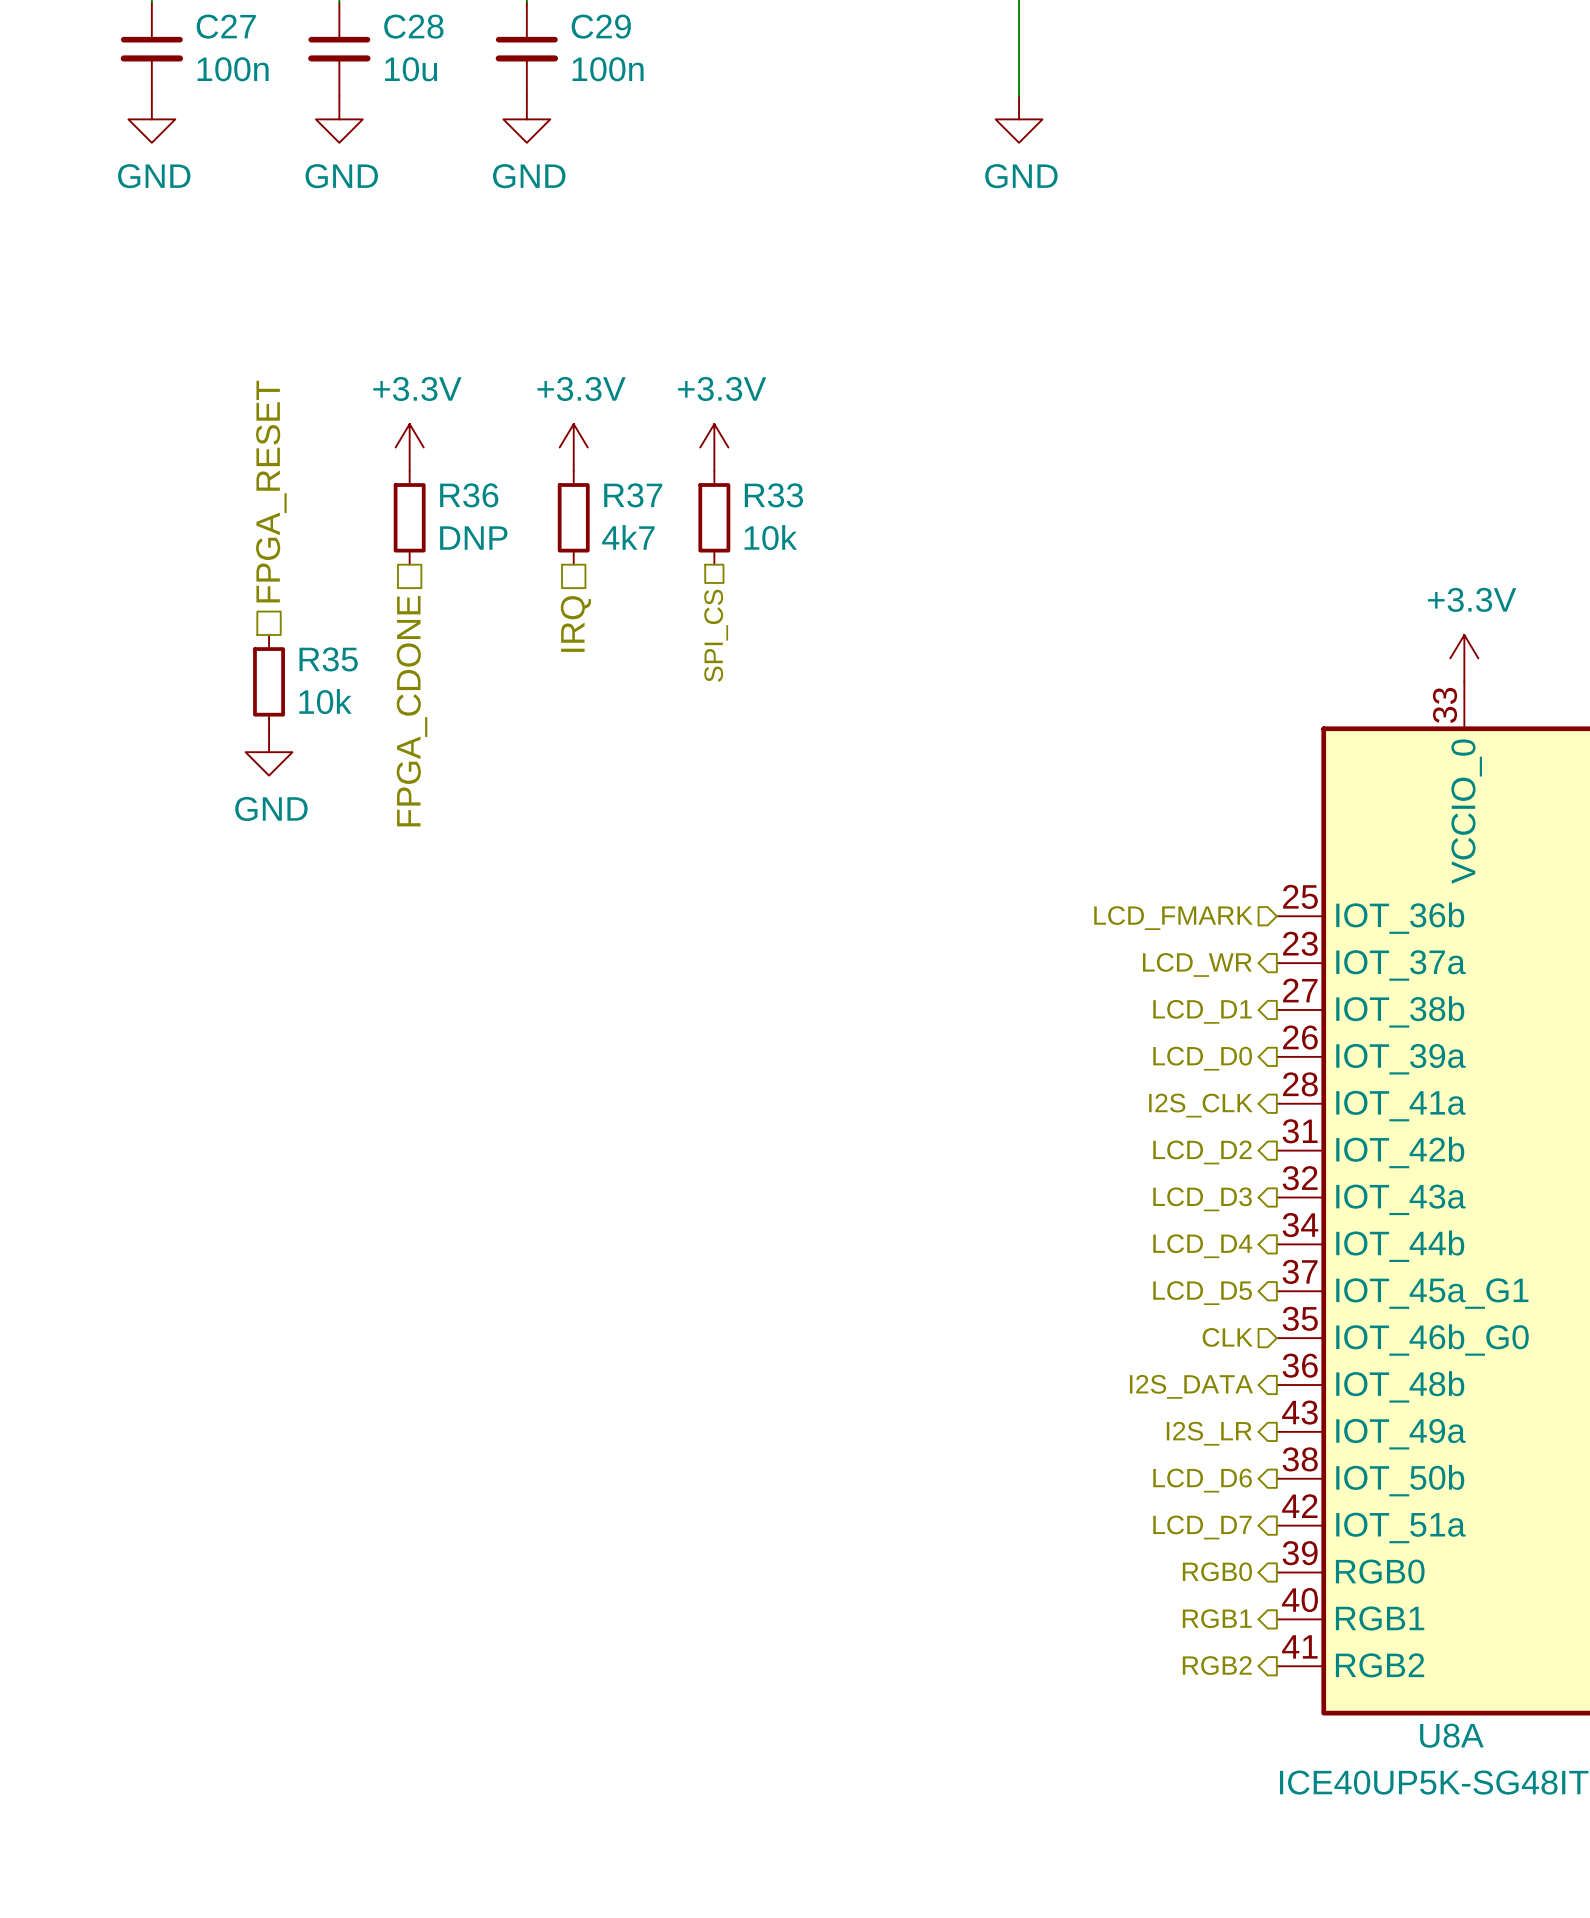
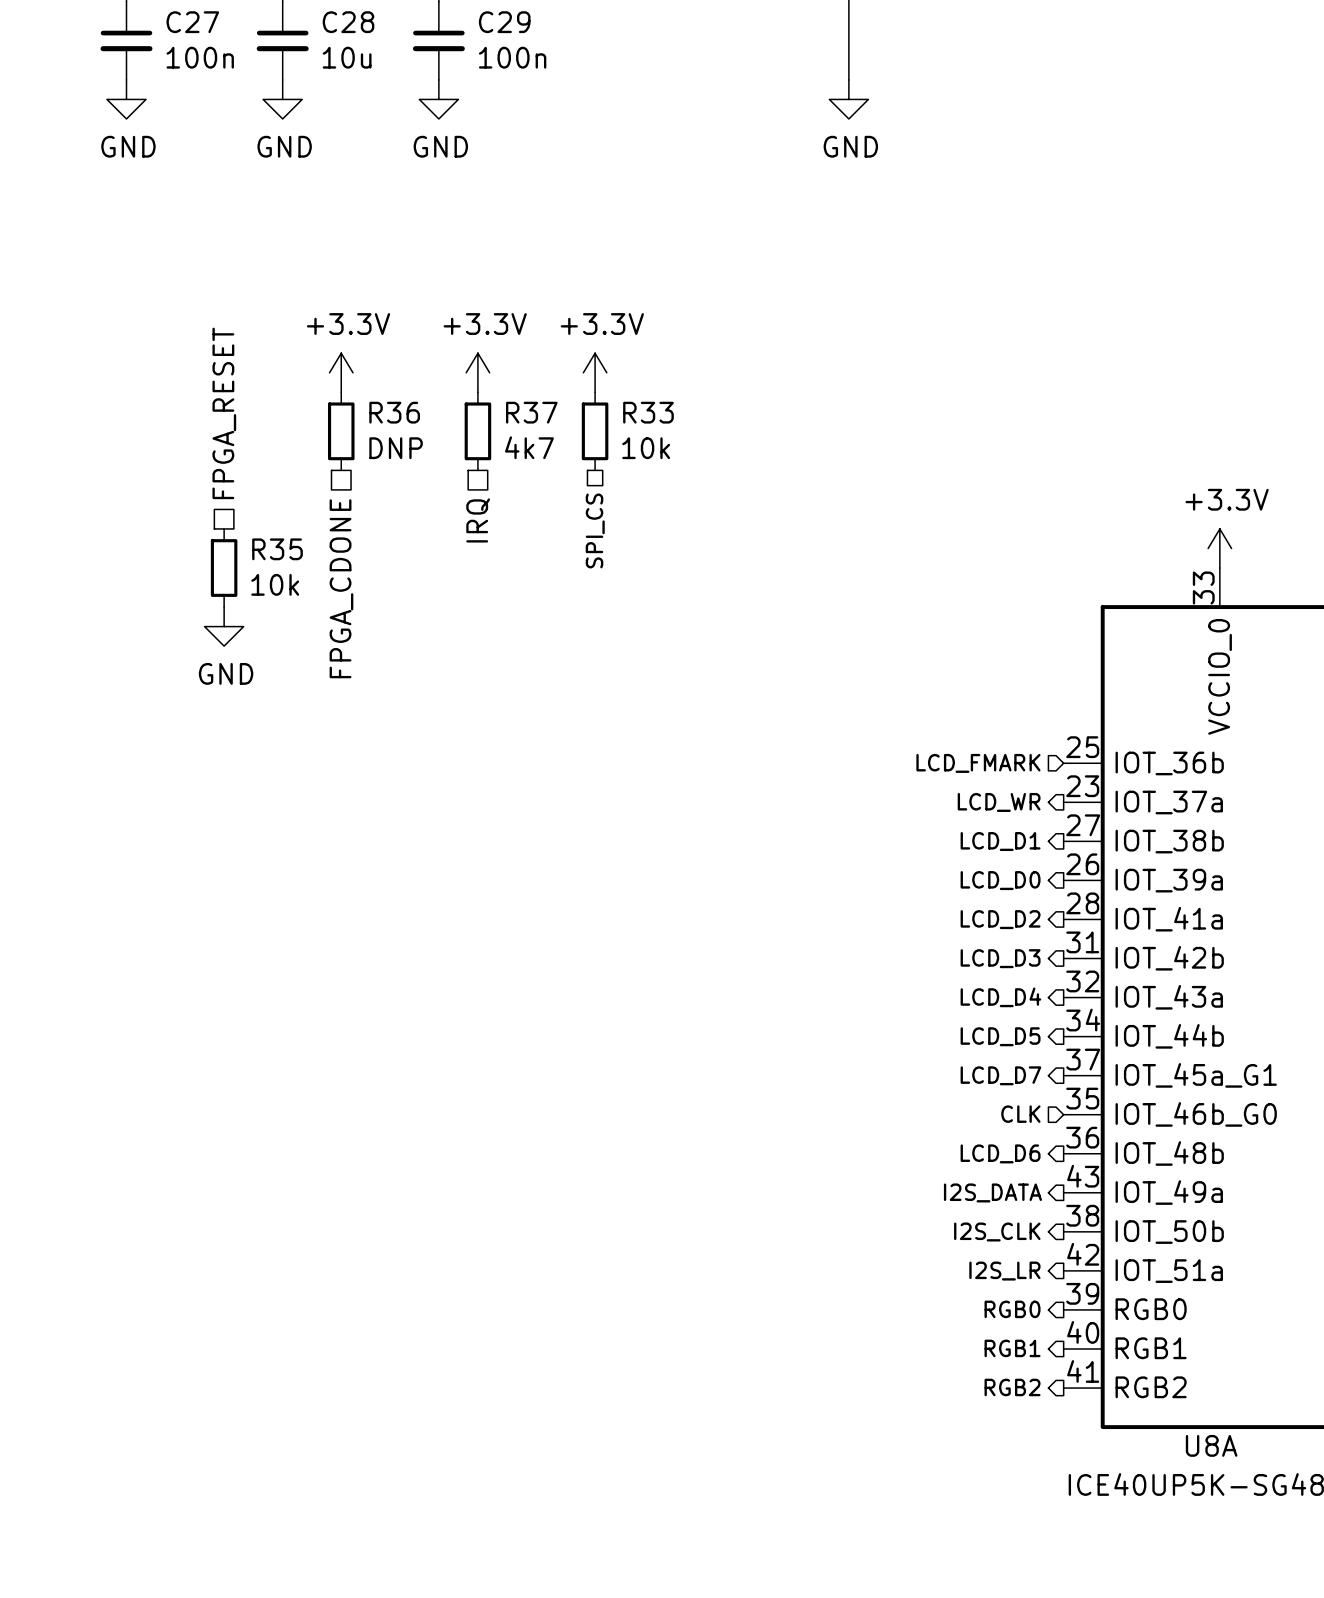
hierarchical label: I2S_CLK (1200, 1105) -> LCD_D2 (1000, 919)
hierarchical label: LCD_D2 (1202, 1152) -> LCD_D3 (1000, 958)
hierarchical label: LCD_D3 (1202, 1199) -> LCD_D4 (1000, 997)
hierarchical label: LCD_D4 (1202, 1246) -> LCD_D5 (1000, 1036)
hierarchical label: LCD_D5 (1202, 1293) -> LCD_D7 (1000, 1075)
hierarchical label: I2S_DATA (1191, 1386) -> LCD_D6 (1000, 1153)
hierarchical label: I2S_LR (1209, 1433) -> I2S_DATA (992, 1192)
hierarchical label: LCD_D6 (1202, 1480) -> I2S_CLK (997, 1232)
hierarchical label: LCD_D7 (1202, 1527) -> I2S_LR (1004, 1271)

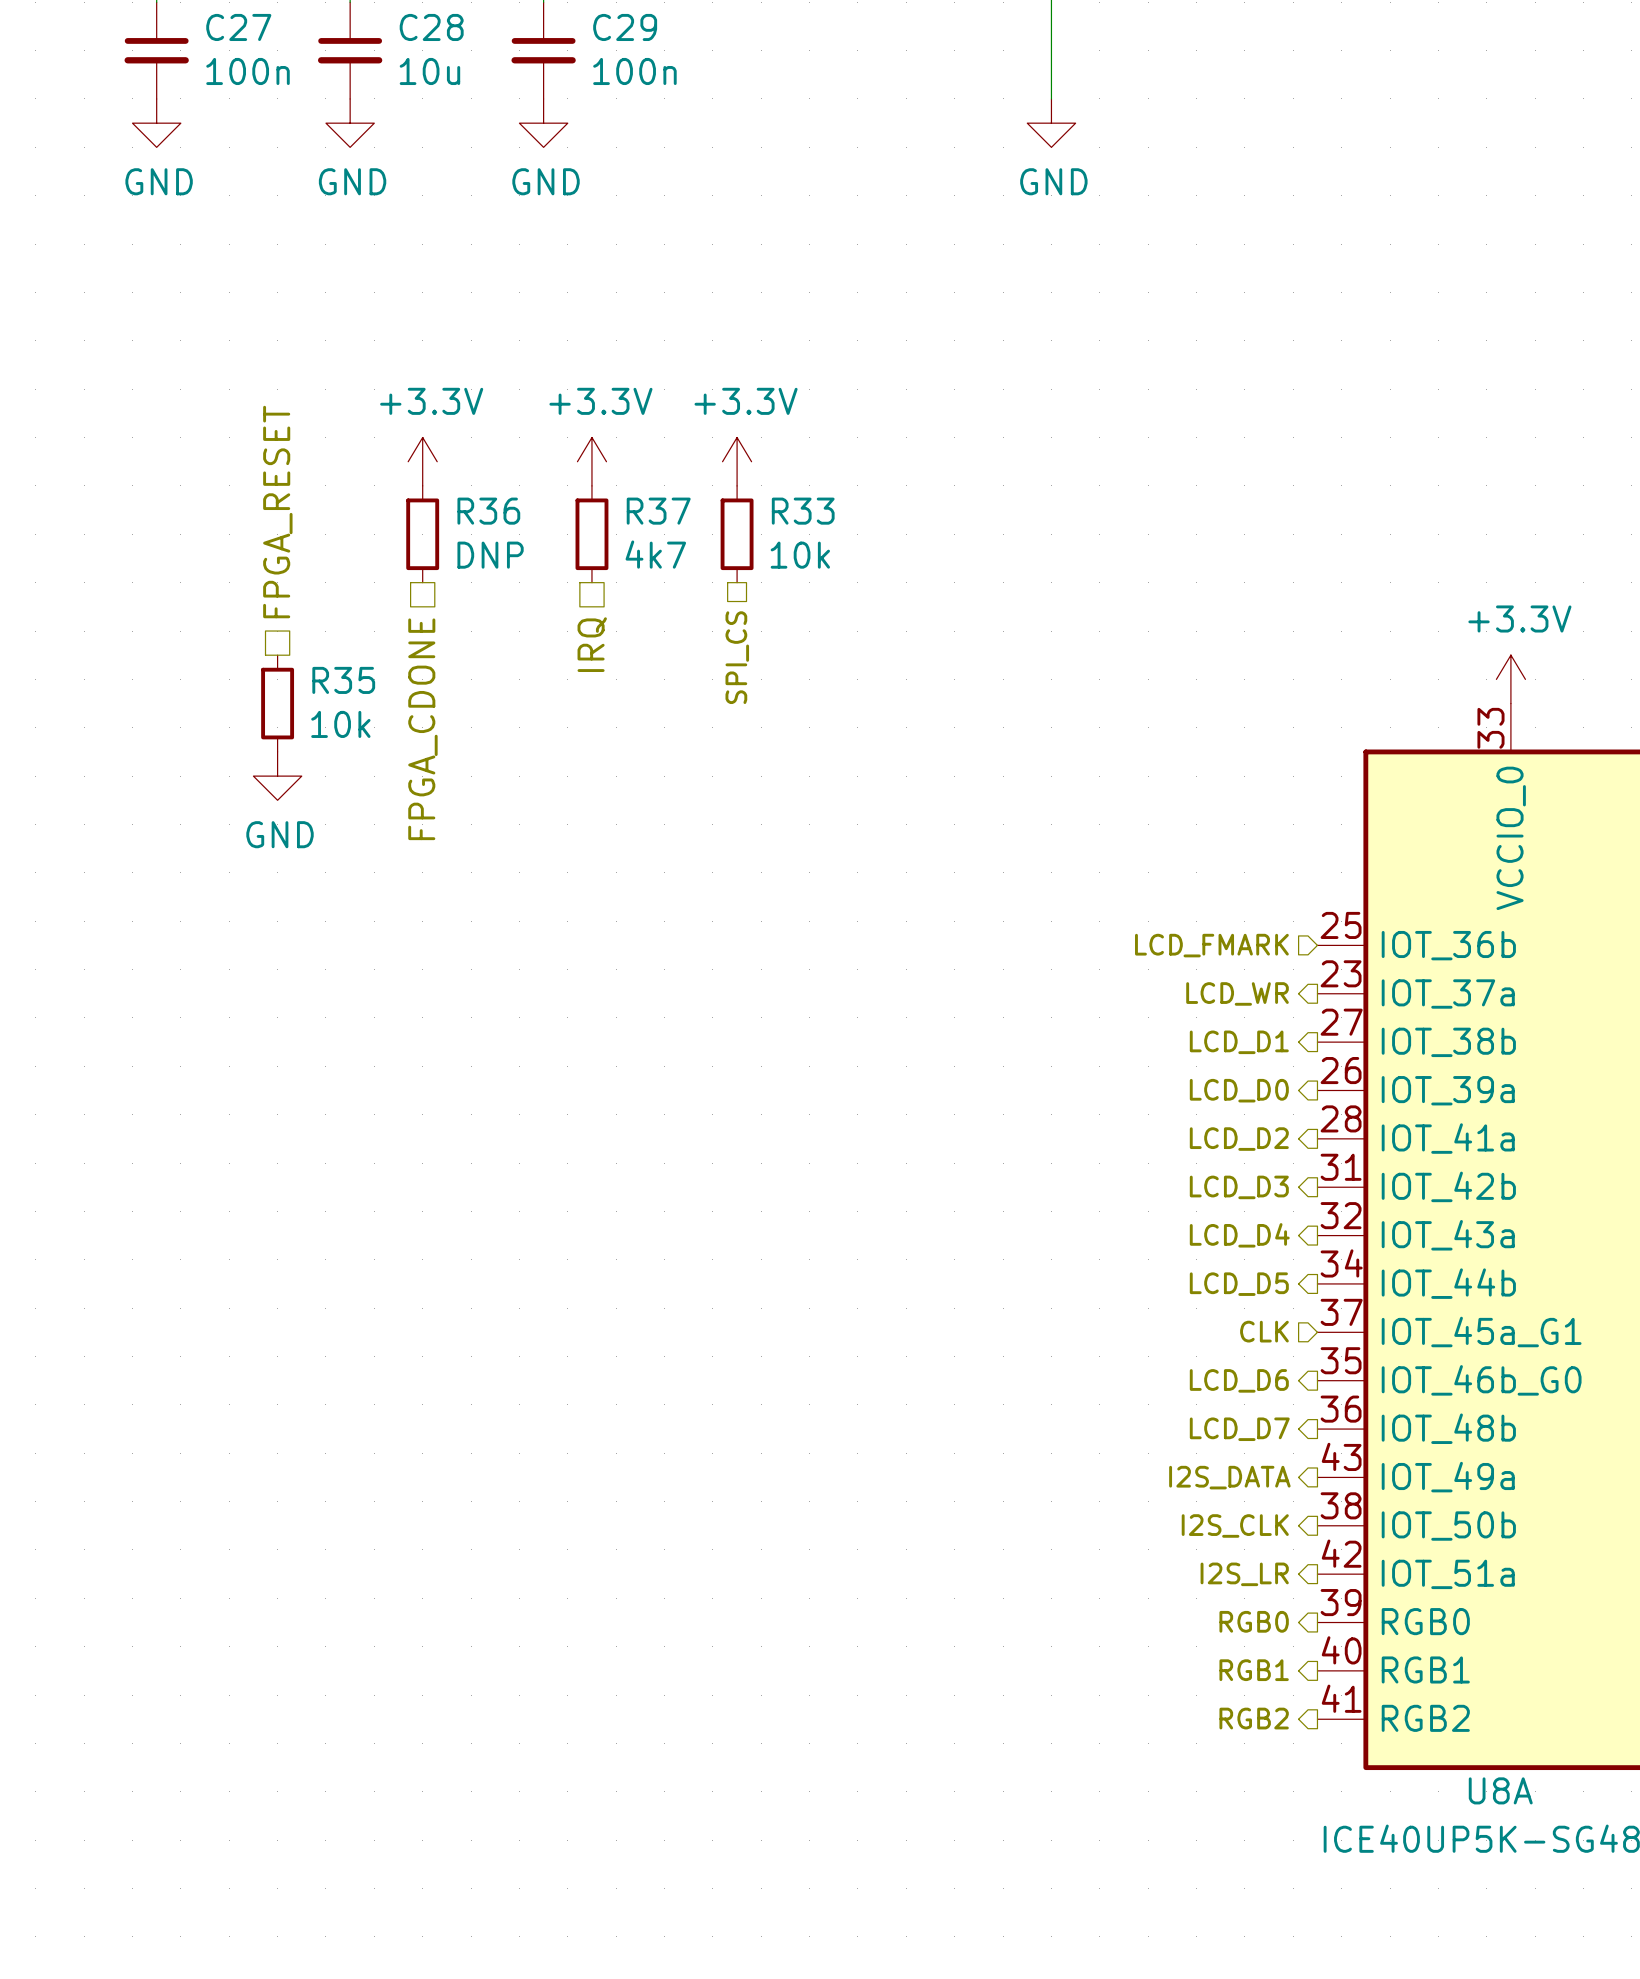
hierarchical label shape: output (1000, 1075) -> input (1264, 1331)
hierarchical label: LCD_D7 (1000, 1075) -> CLK (1264, 1331)
hierarchical label shape: input (1020, 1114) -> output (1239, 1380)
hierarchical label: CLK (1020, 1114) -> LCD_D6 (1239, 1380)
hierarchical label: LCD_D6 (1000, 1153) -> LCD_D7 (1239, 1429)

